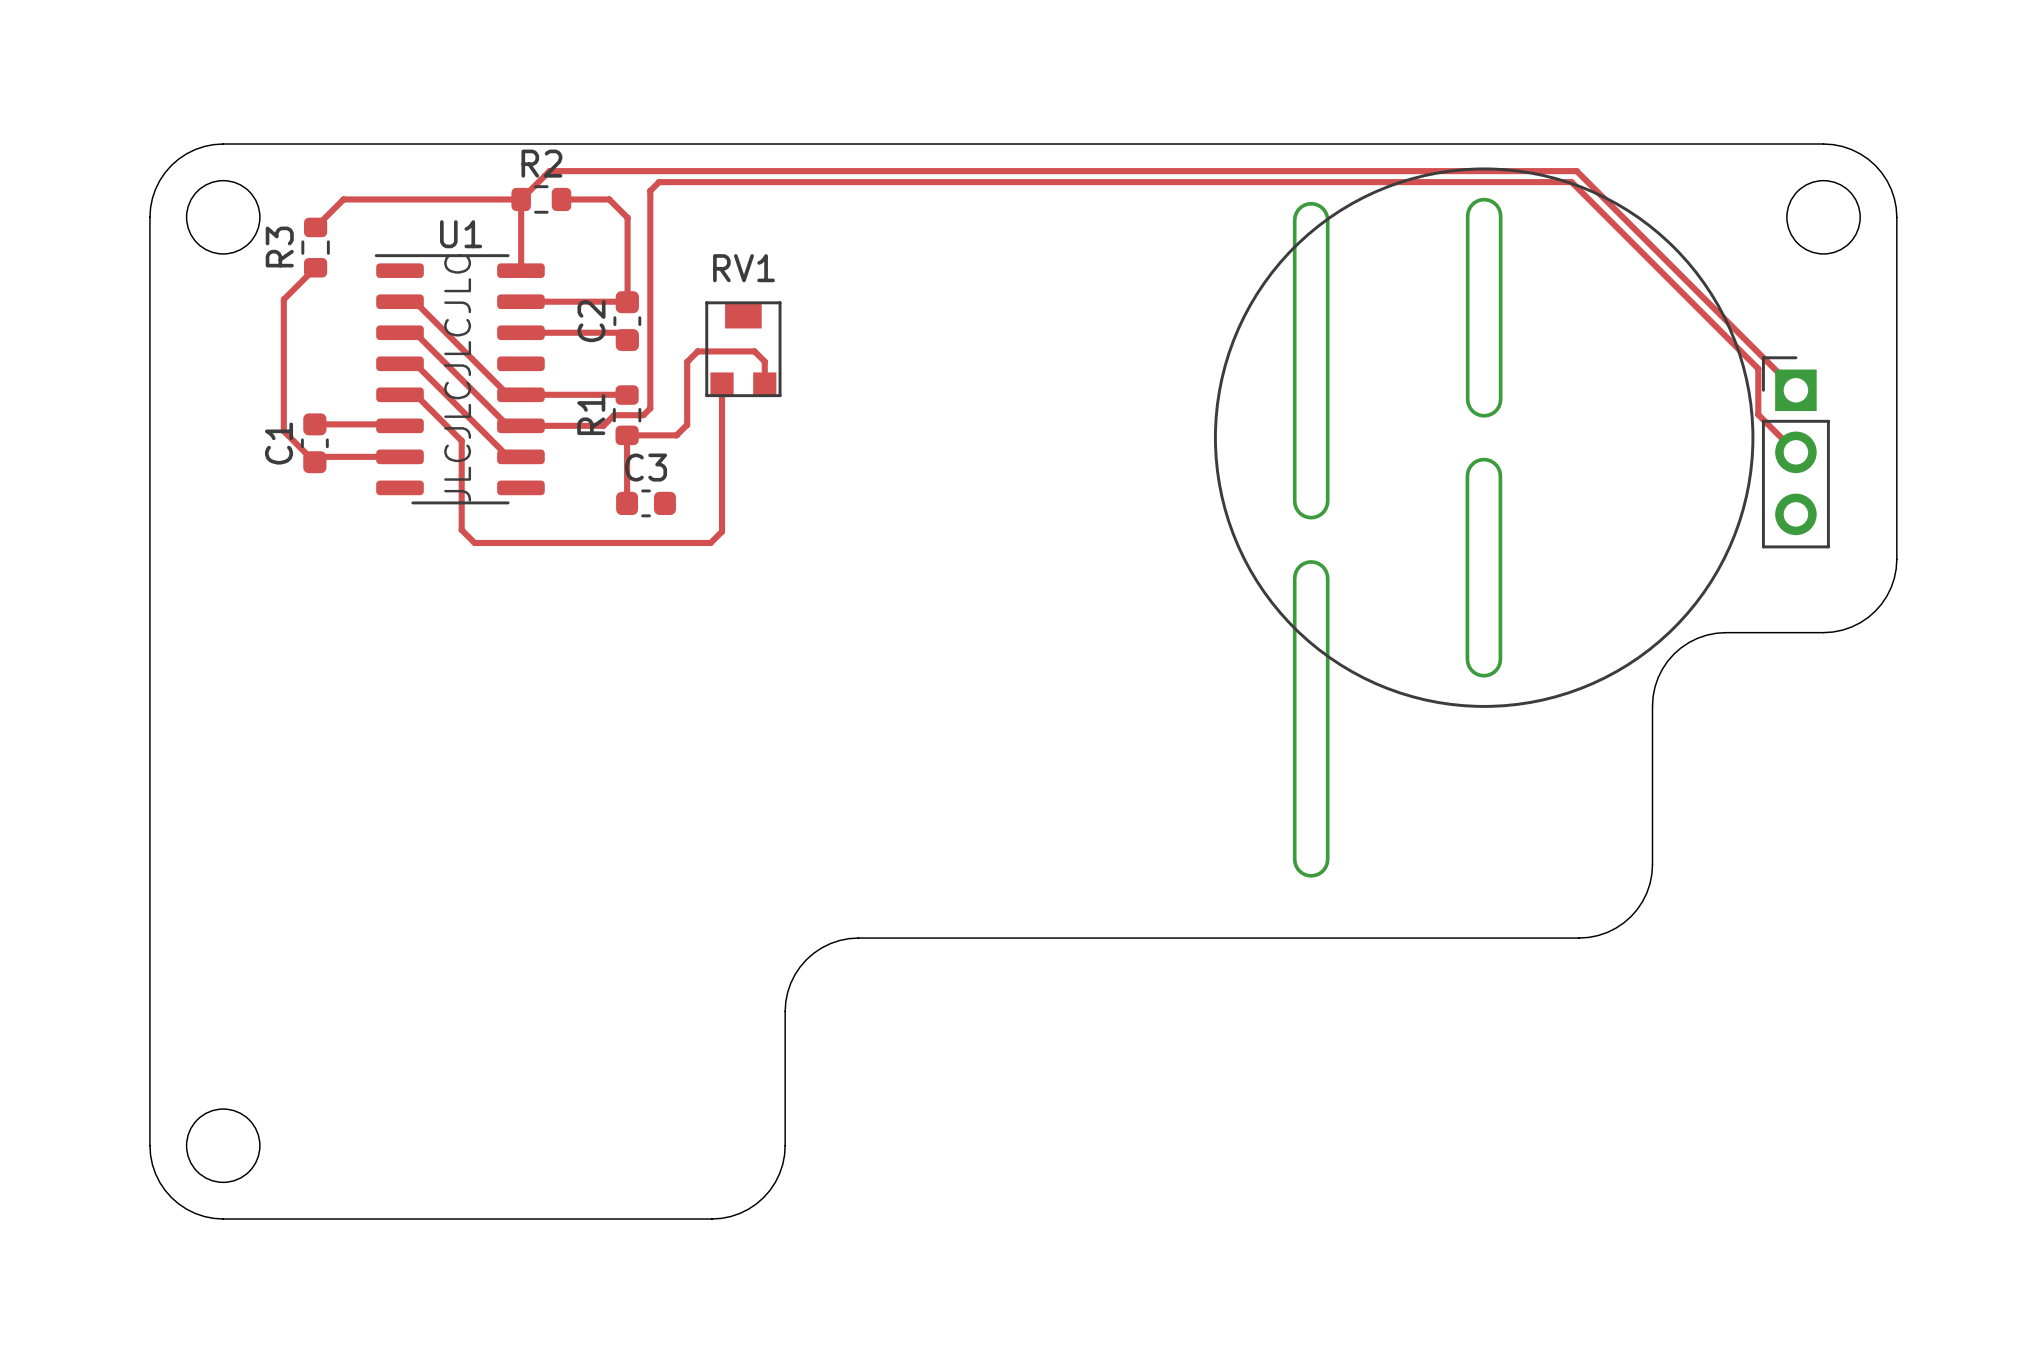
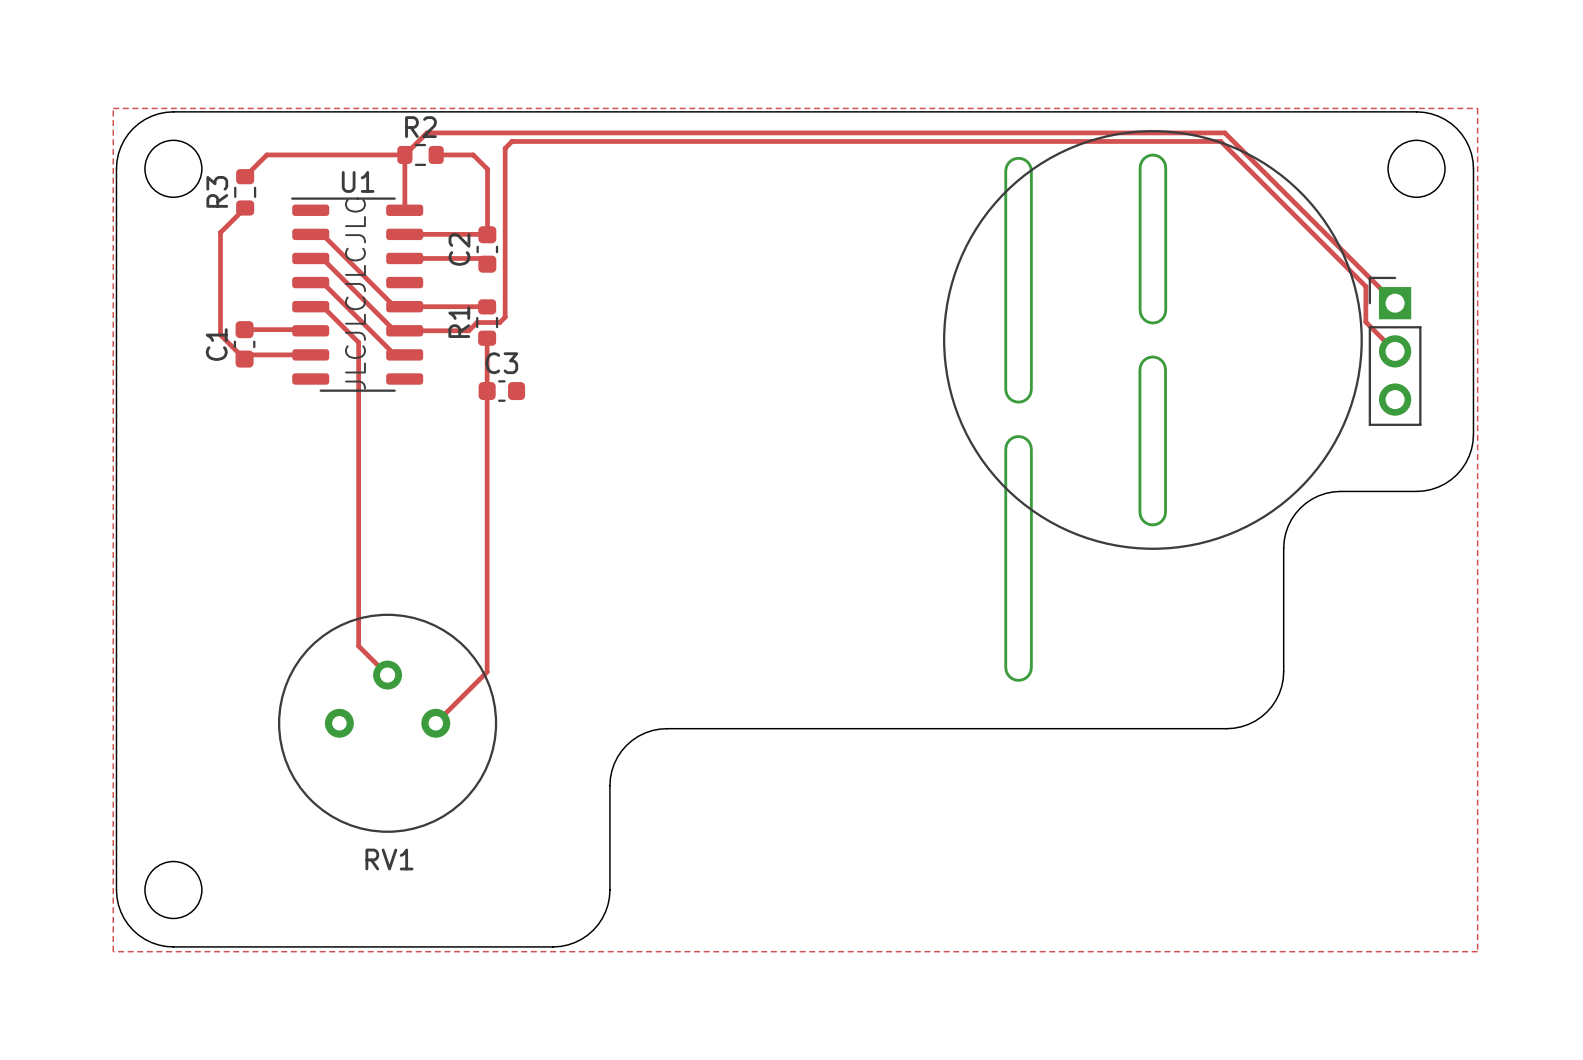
zone outline: none -> (113, 108) (113, 951) (1477, 951) (1477, 108) (113, 108)
RV1 name position: RV1 (743, 268) -> RV1 (389, 859)
RV1 footprint: [705, 301, 782, 398] -> [277, 613, 498, 833]
track: (722, 384) (722, 531) (710, 542) (474, 542) (461, 530) -> (387, 675) (358, 646) (358, 411)
track: (764, 384) (764, 361) (754, 351) (697, 351) (687, 361) (687, 424) (676, 435) (627, 435) -> none
track: none -> (487, 391) (487, 671) (435, 723)

